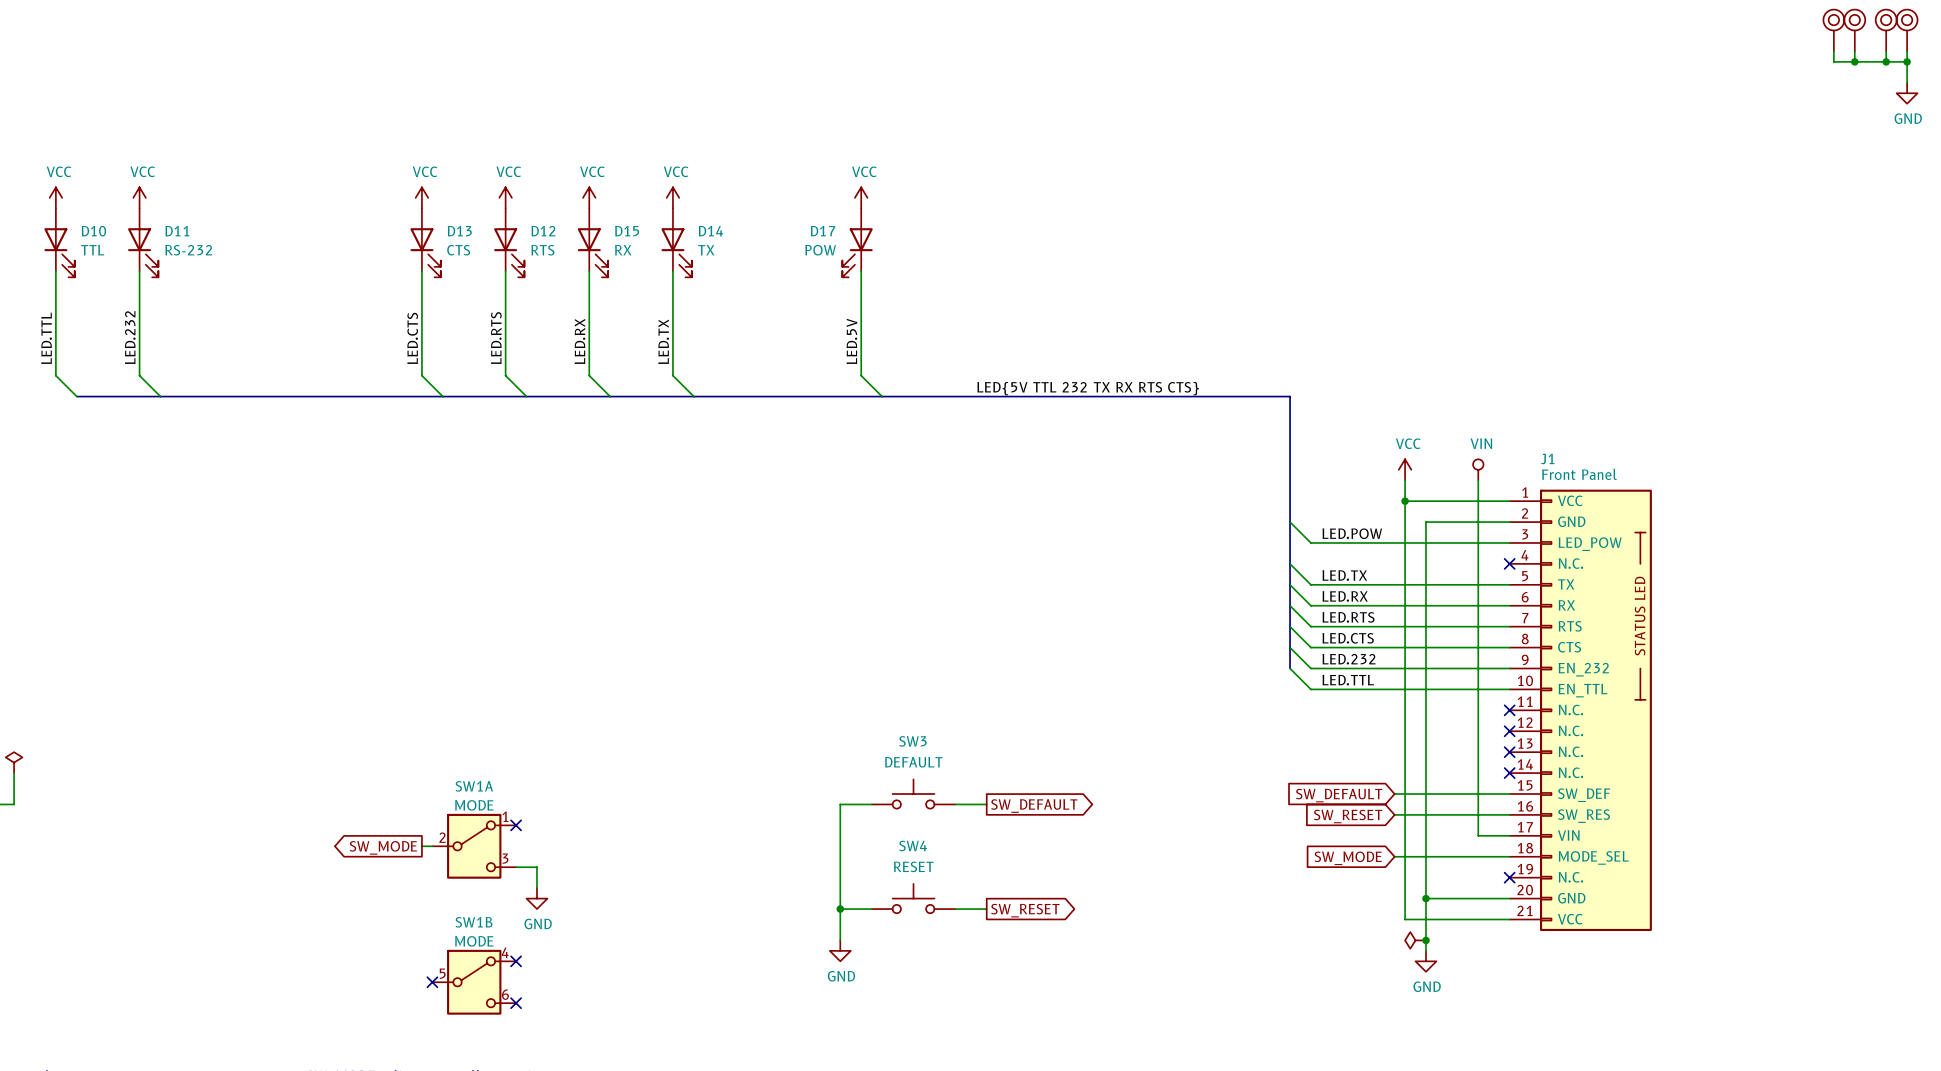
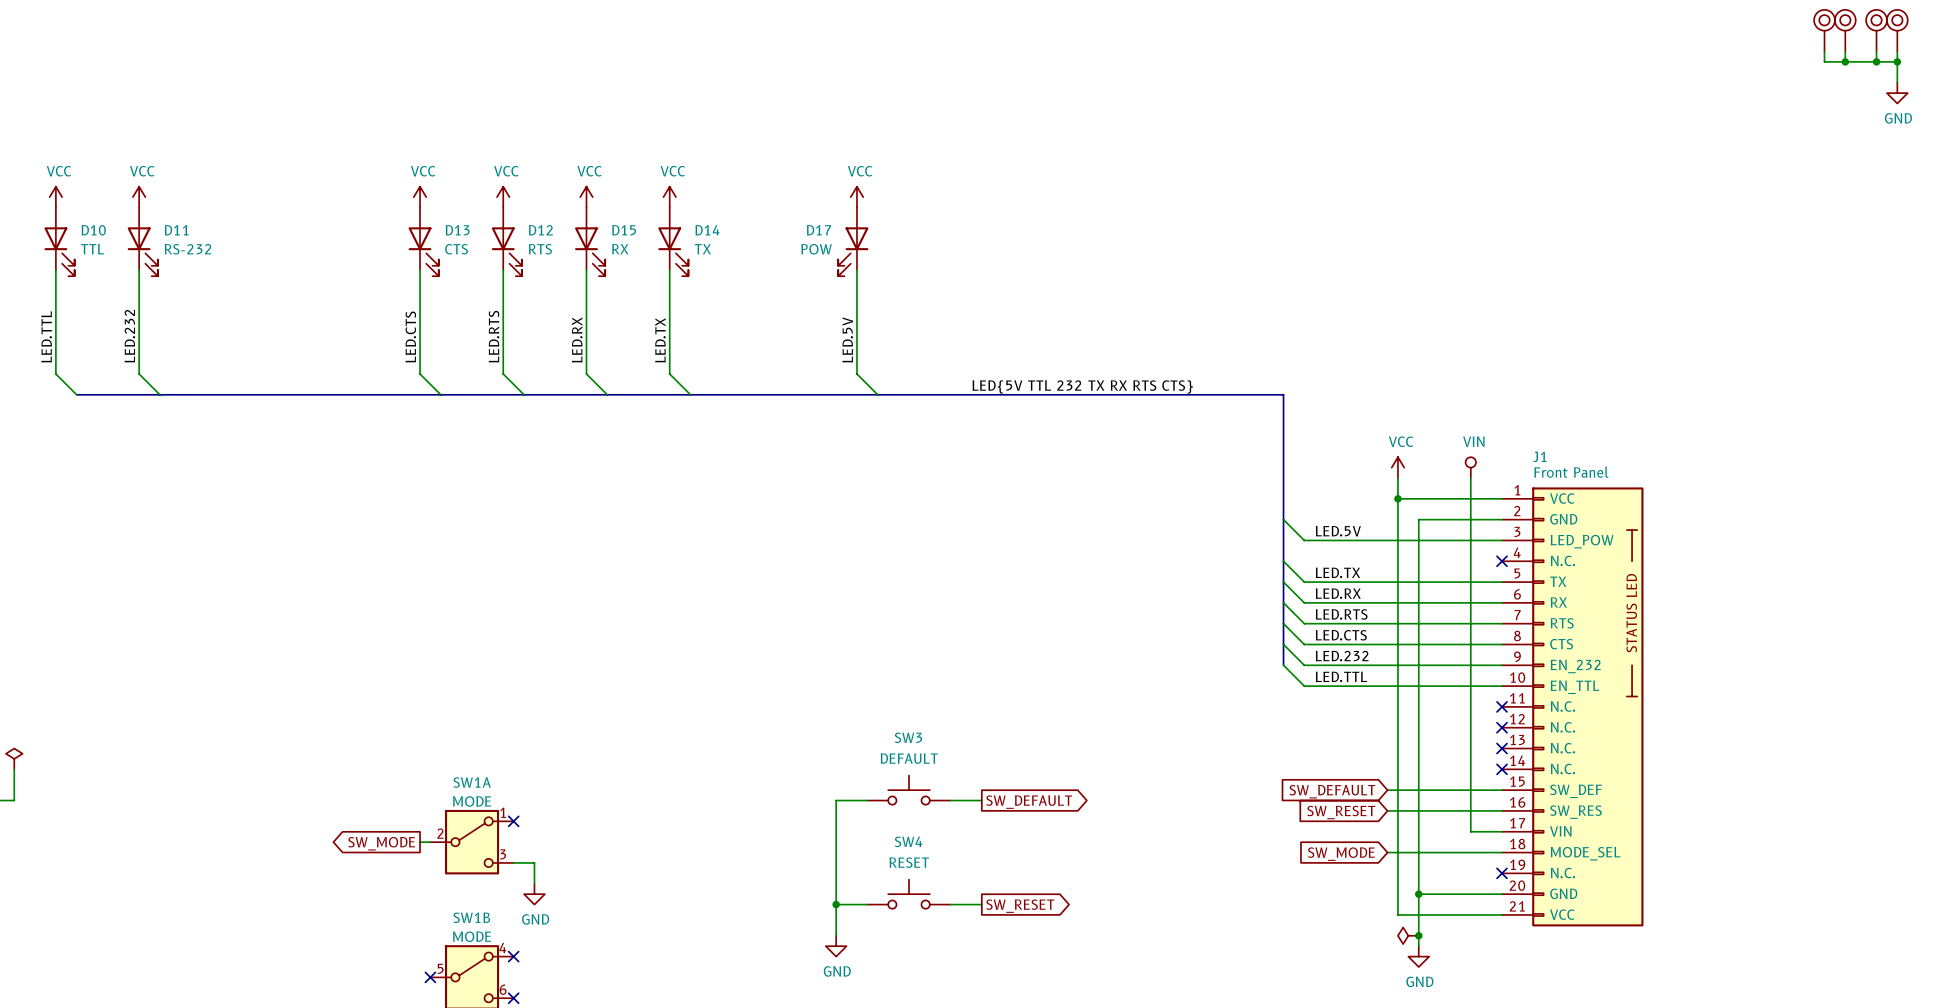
label: LED.POW (1352, 533) -> LED.5V (1338, 531)

